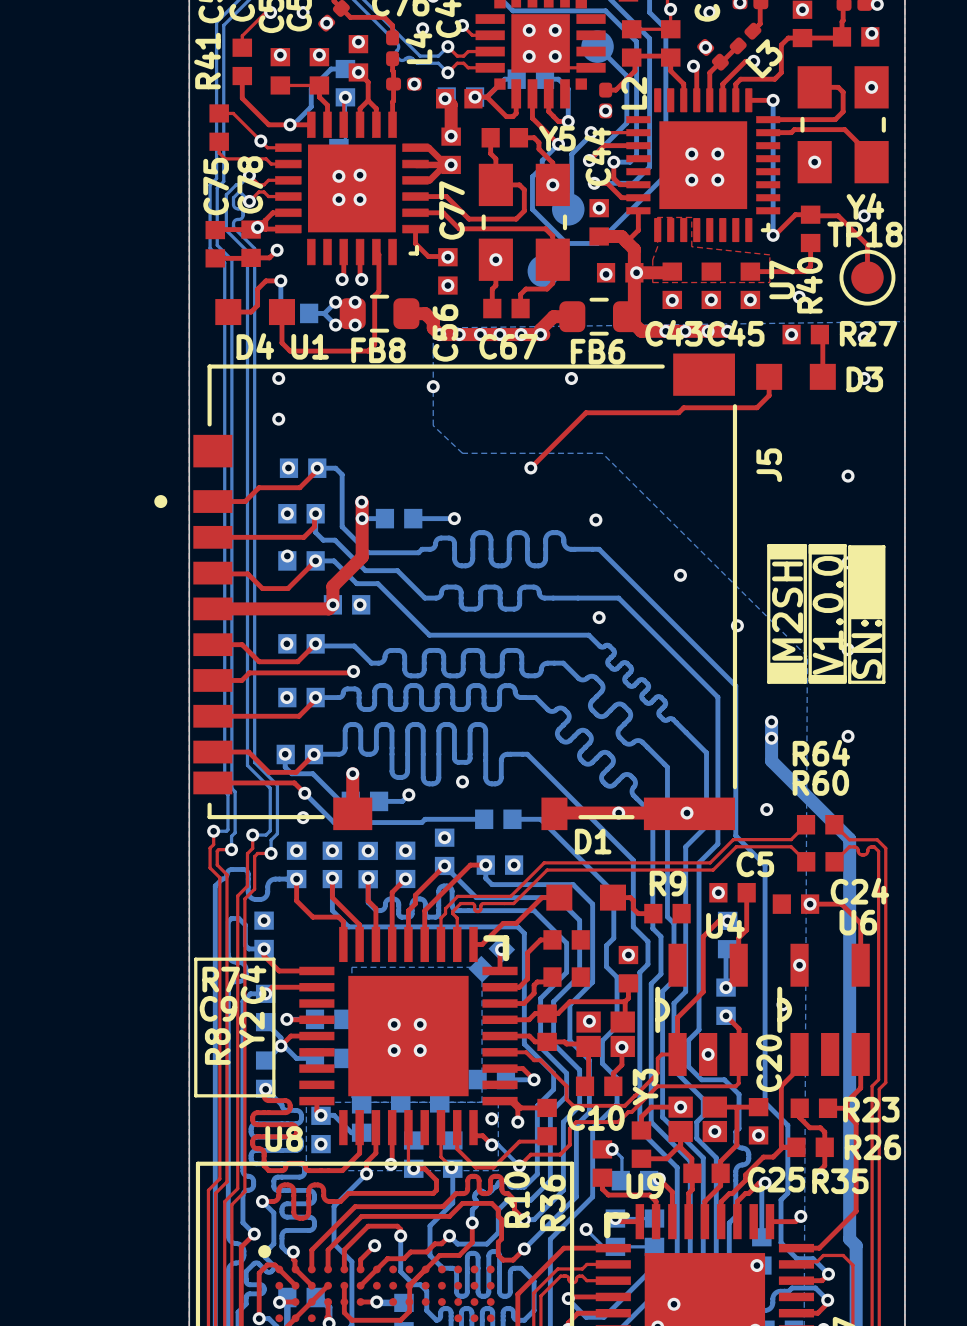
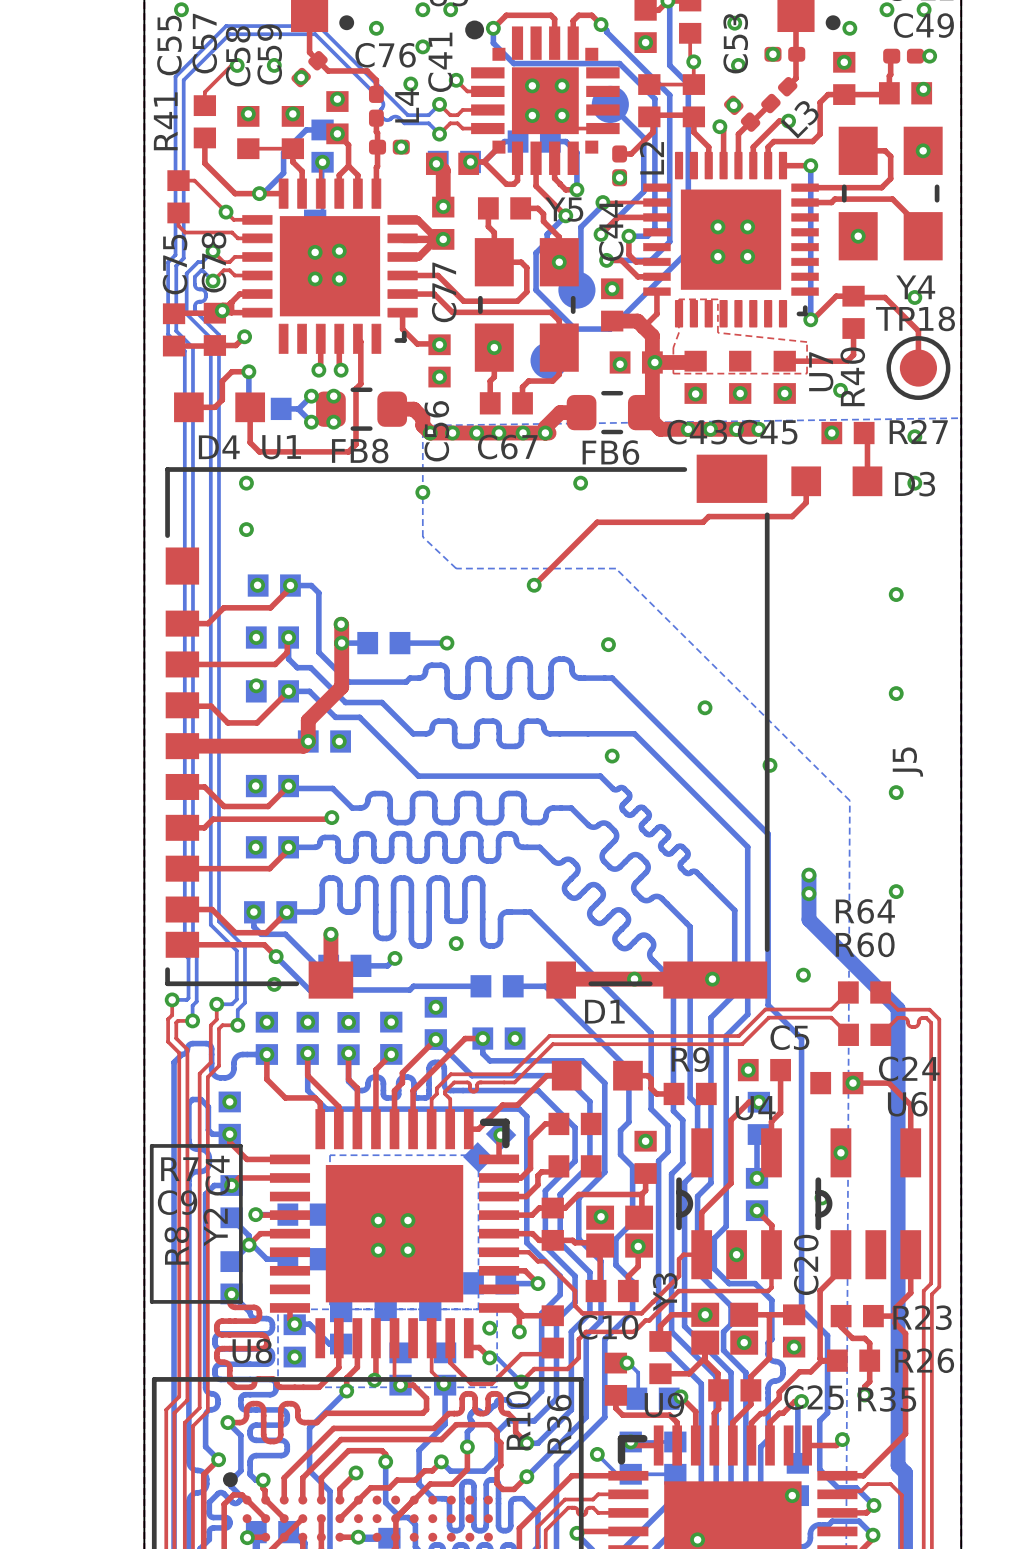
J5 footprint: [154, 353, 738, 831] -> [165, 454, 770, 999]
J5 name position: J5 (769, 465) -> J5 (907, 762)
line: (768, 545) (805, 545) (805, 682) (768, 682) (768, 545) -> none
drawing: [768, 545, 885, 620] -> none
line: (810, 545) (810, 680) (845, 680) (845, 545) (810, 545) -> none
line: (849, 546) (883, 546) (883, 682) (849, 682) (849, 546) -> none
text: M2SH (787, 611) -> none
text: V1.0.0 (828, 615) -> none
text: SN: (866, 649) -> none
drawing: [768, 662, 847, 684] -> none

